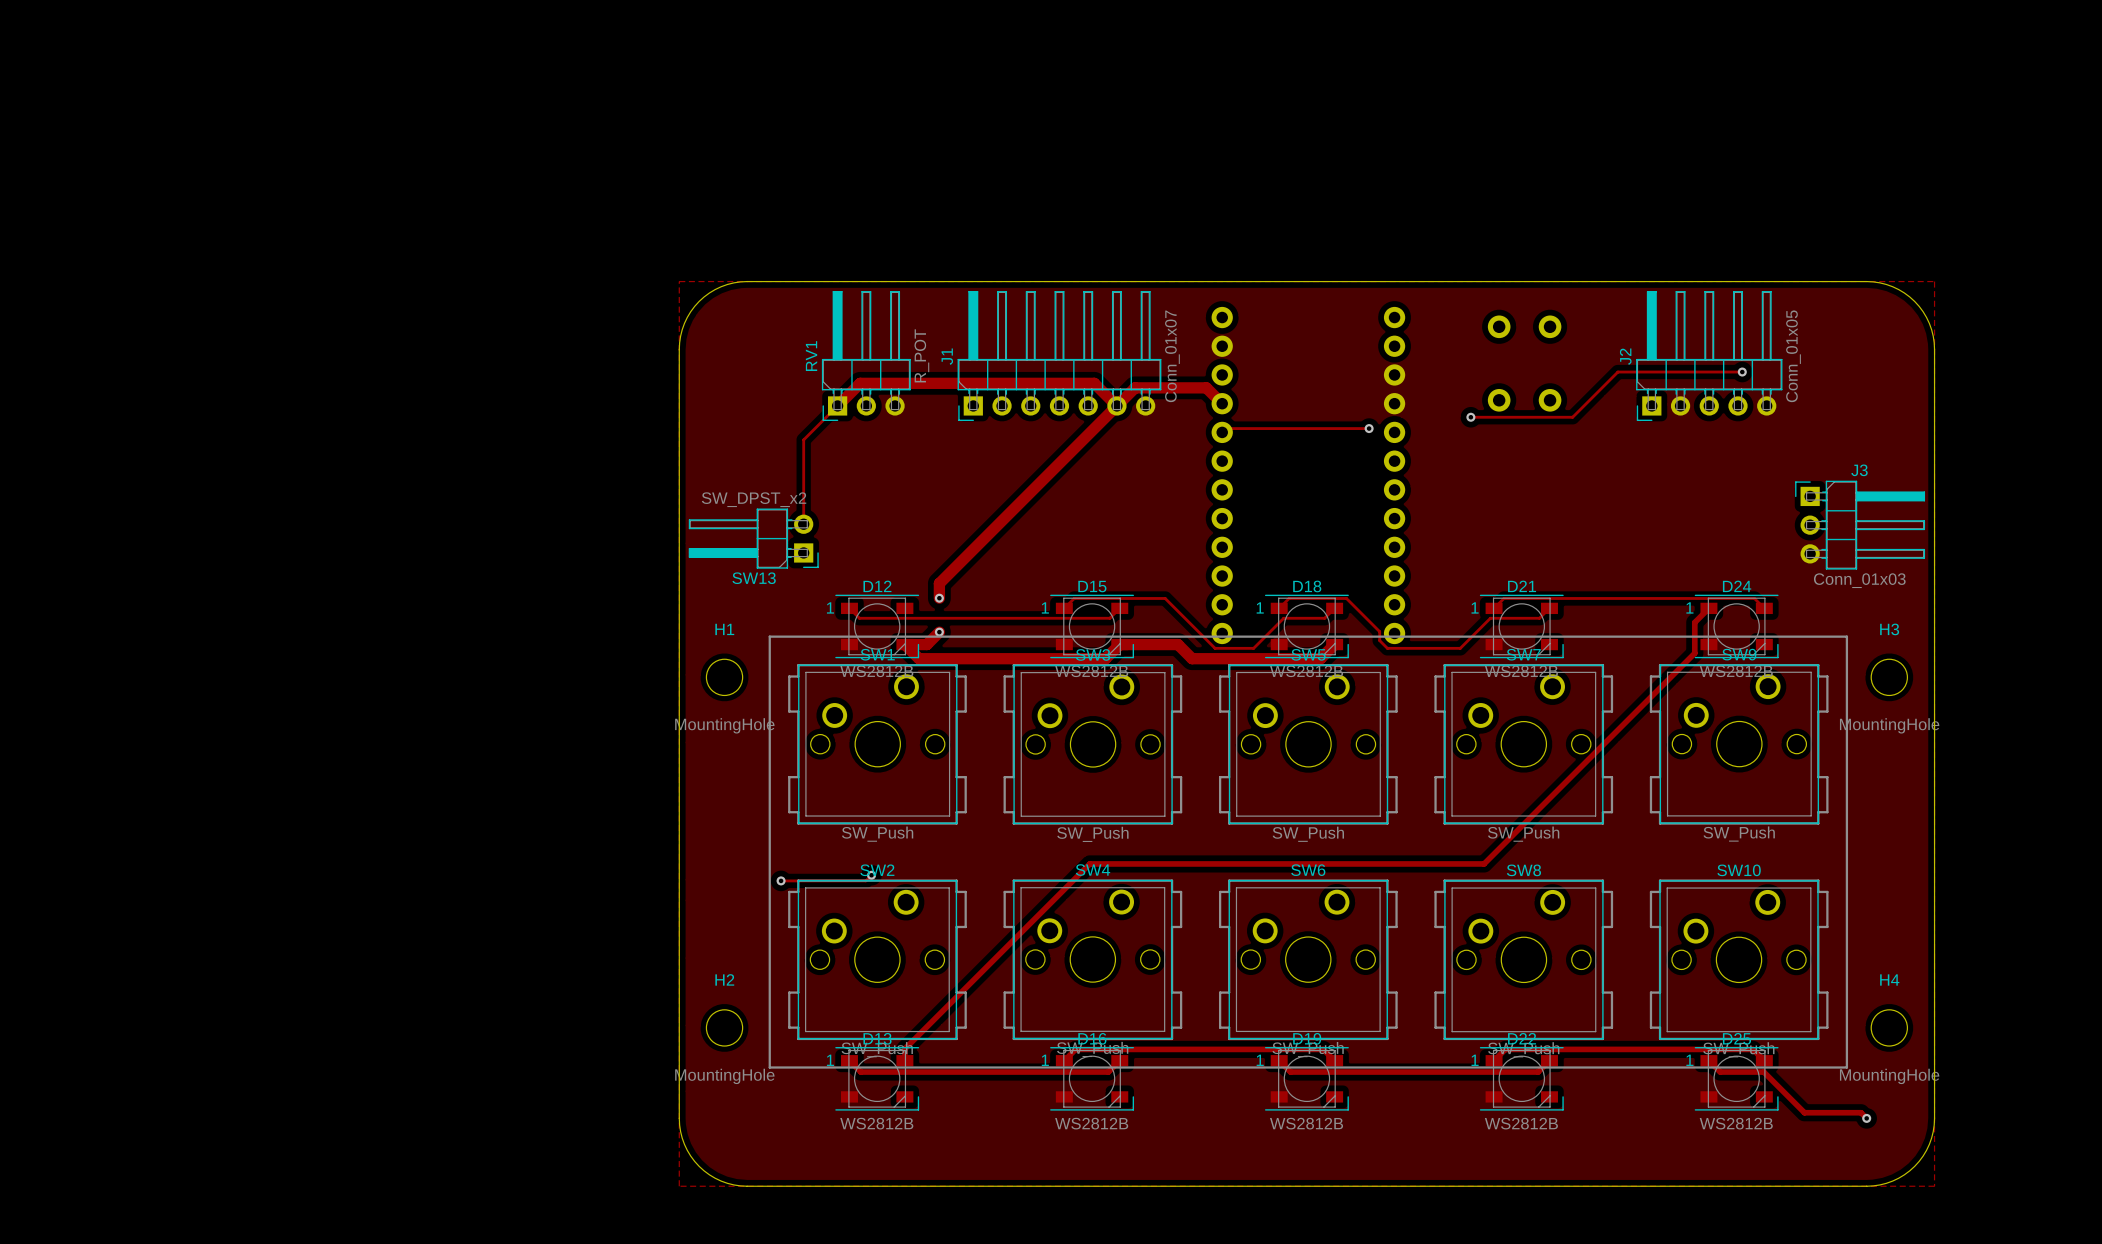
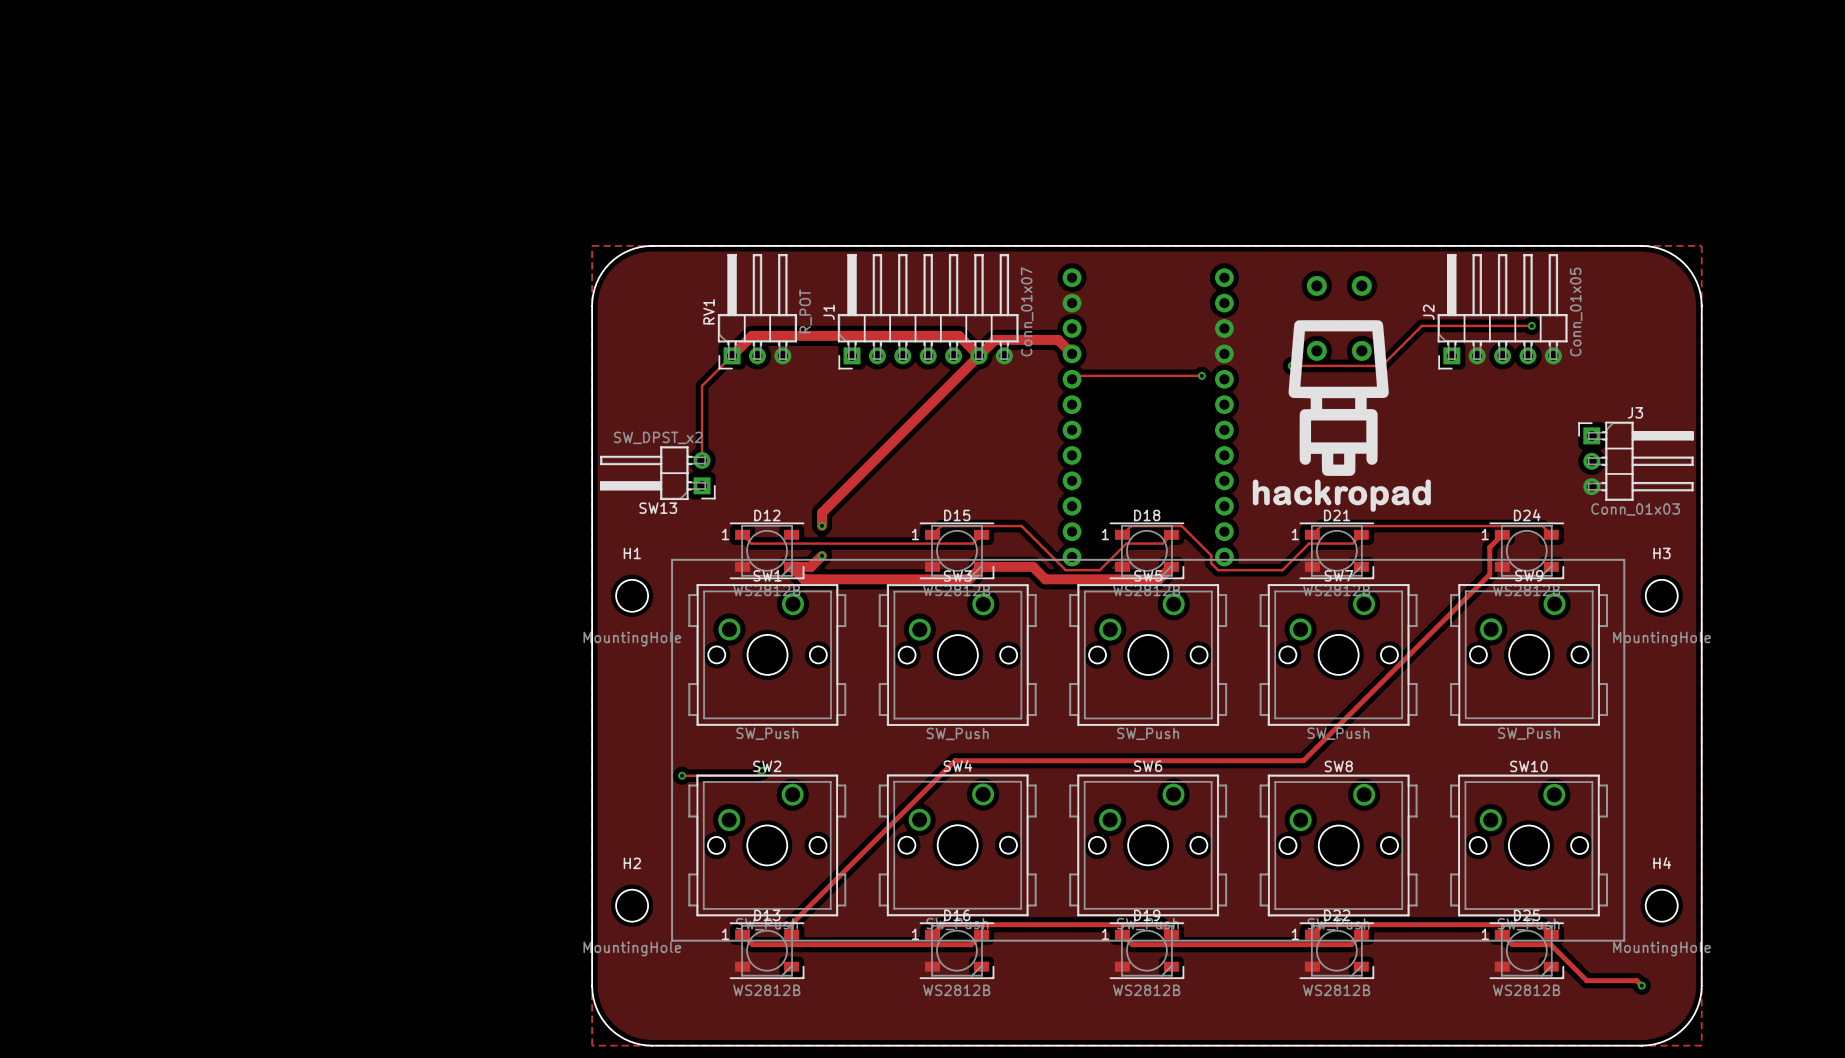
drawing: none -> [1252, 320, 1431, 512]

